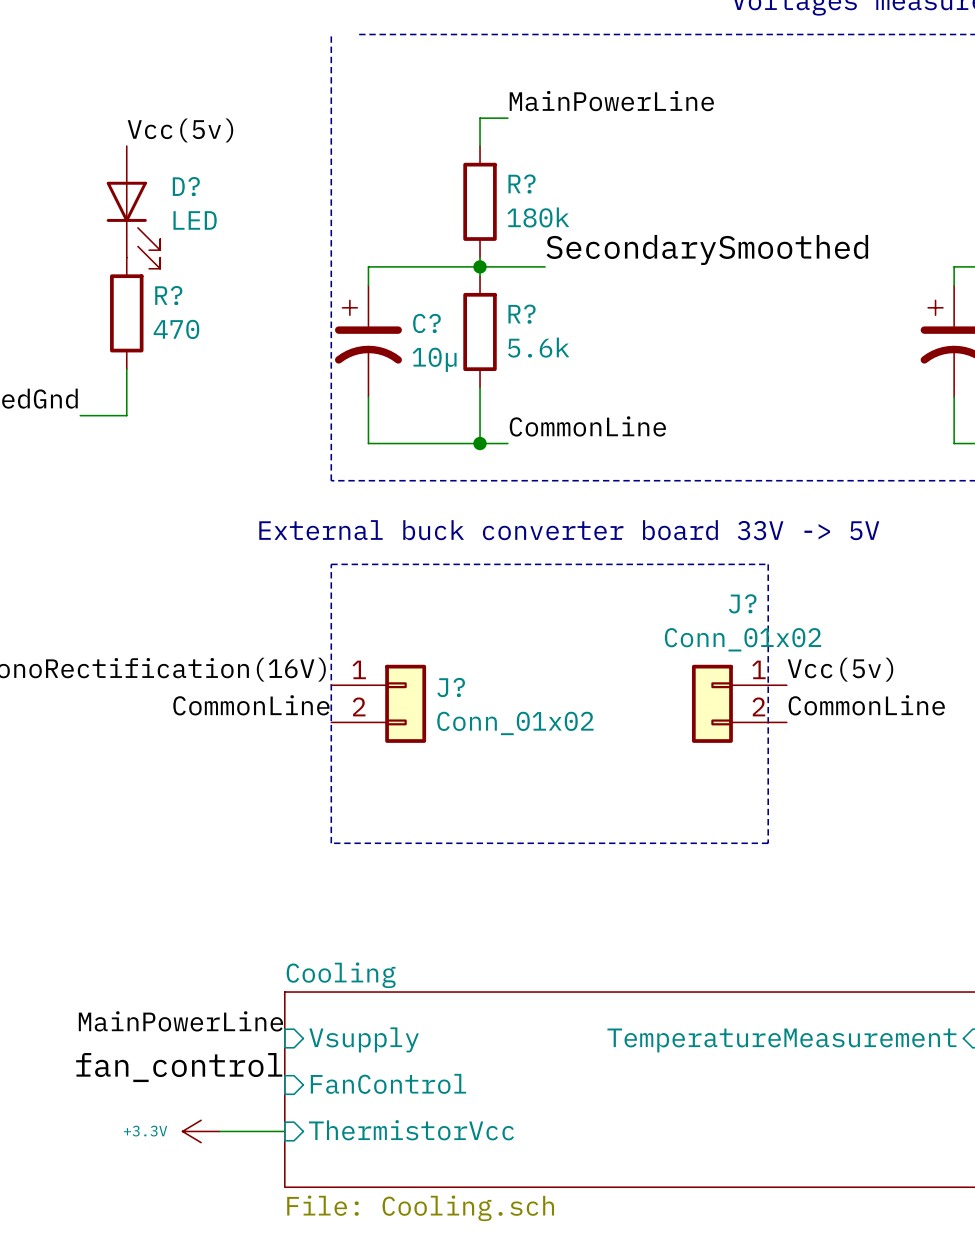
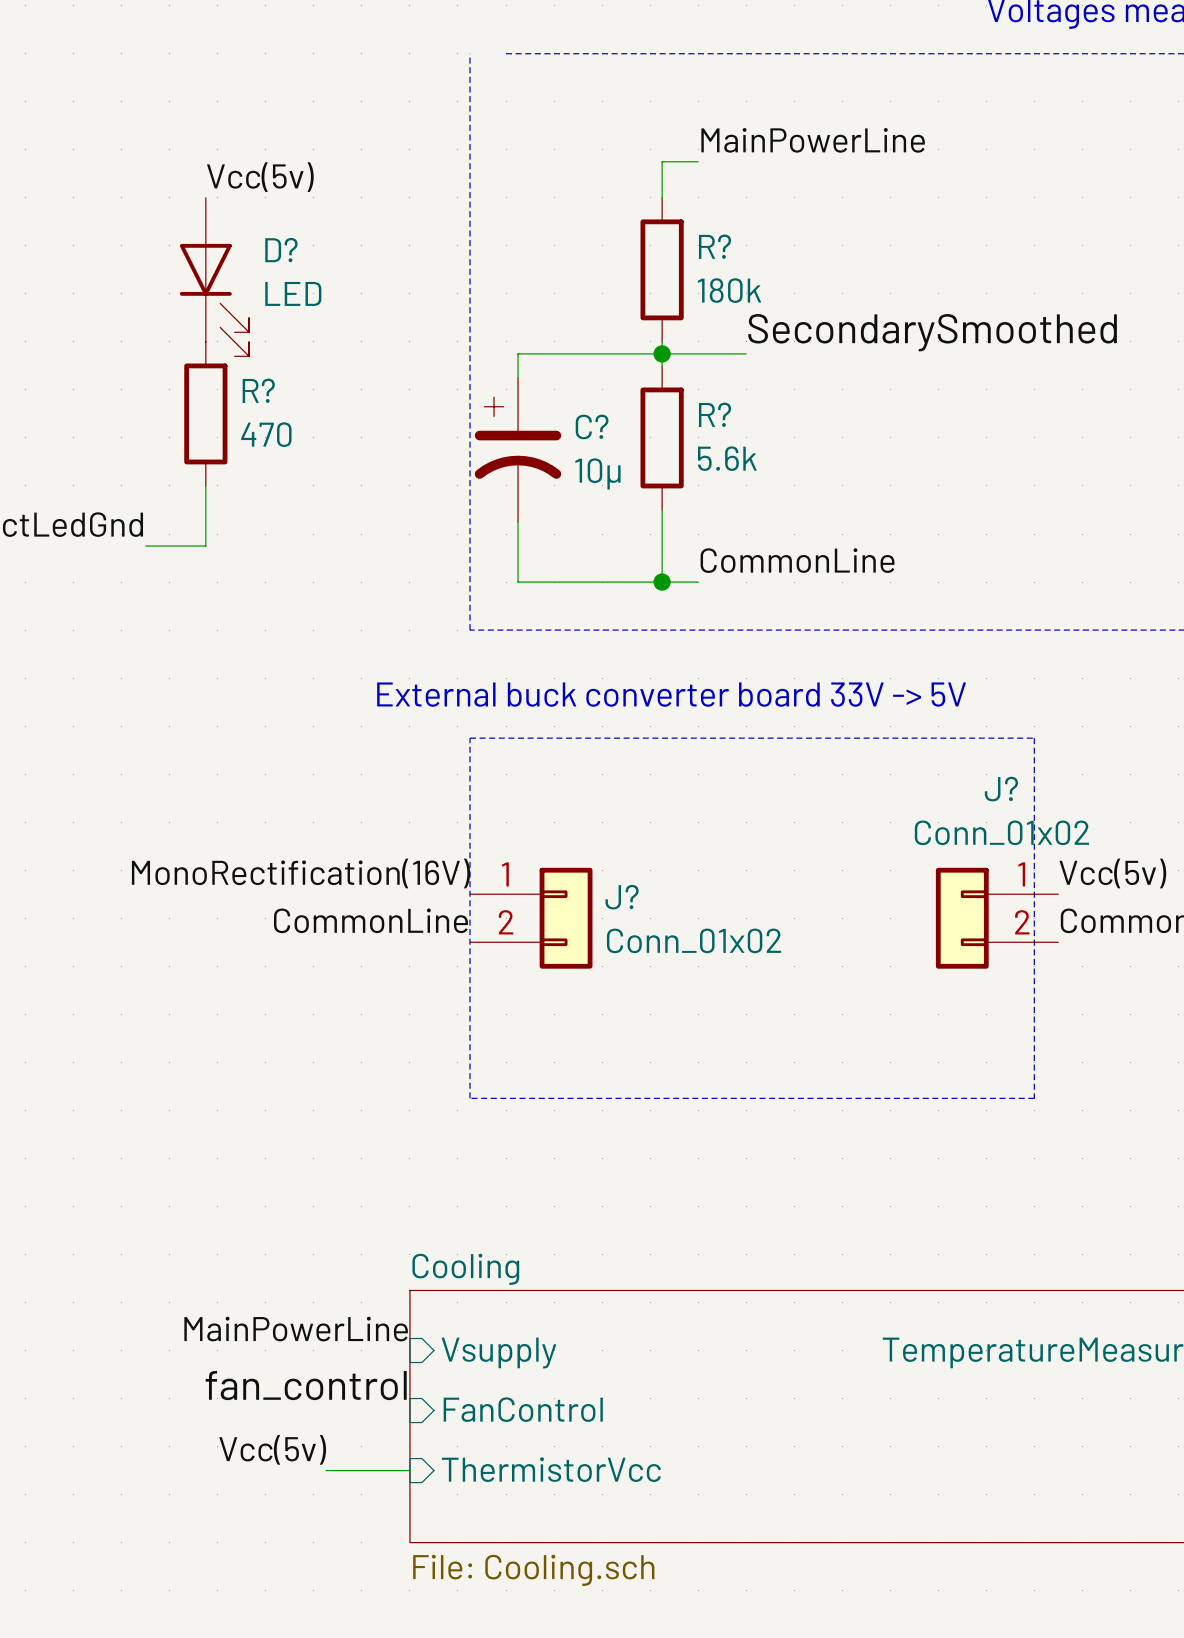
label: none -> Vcc(5v) (272, 1449)
power symbol: +3.3V (201, 1131) -> none

